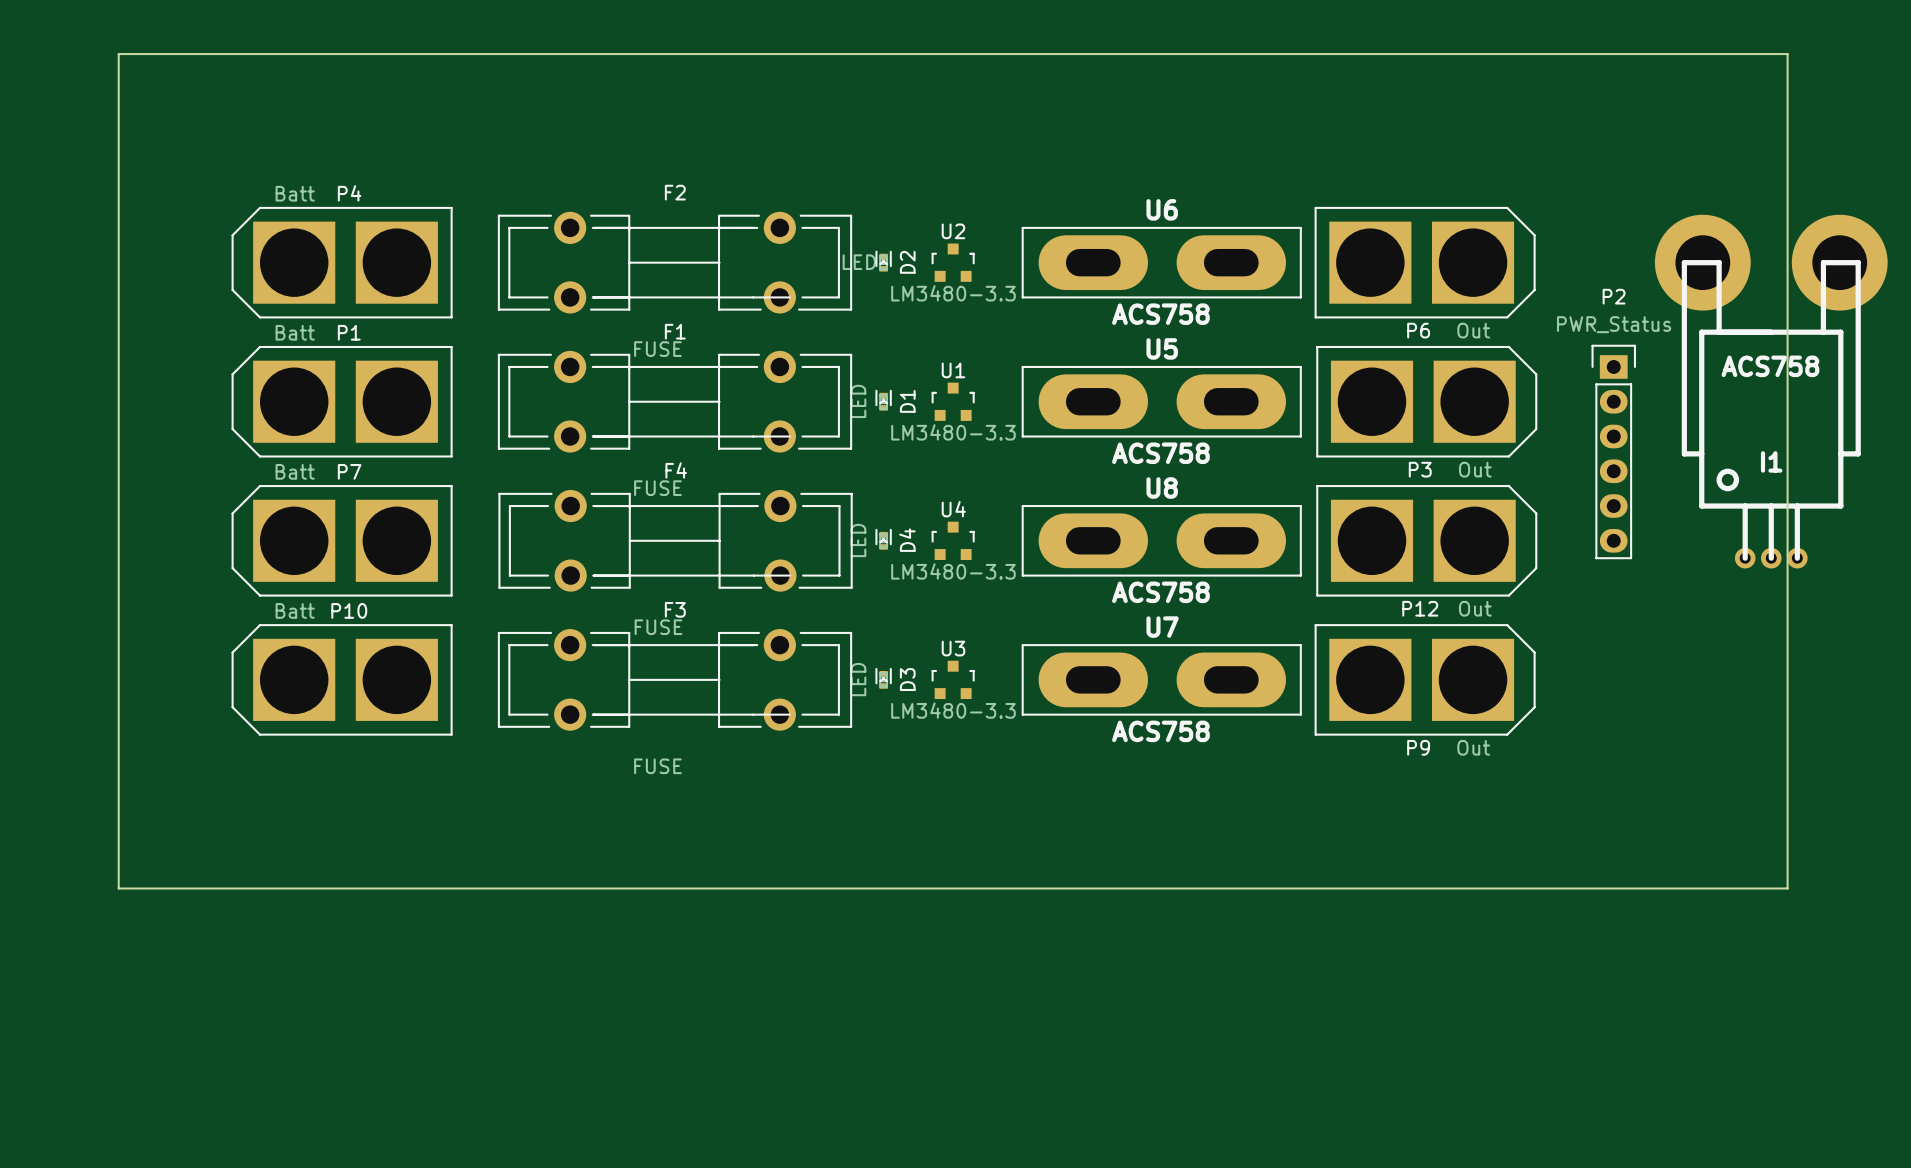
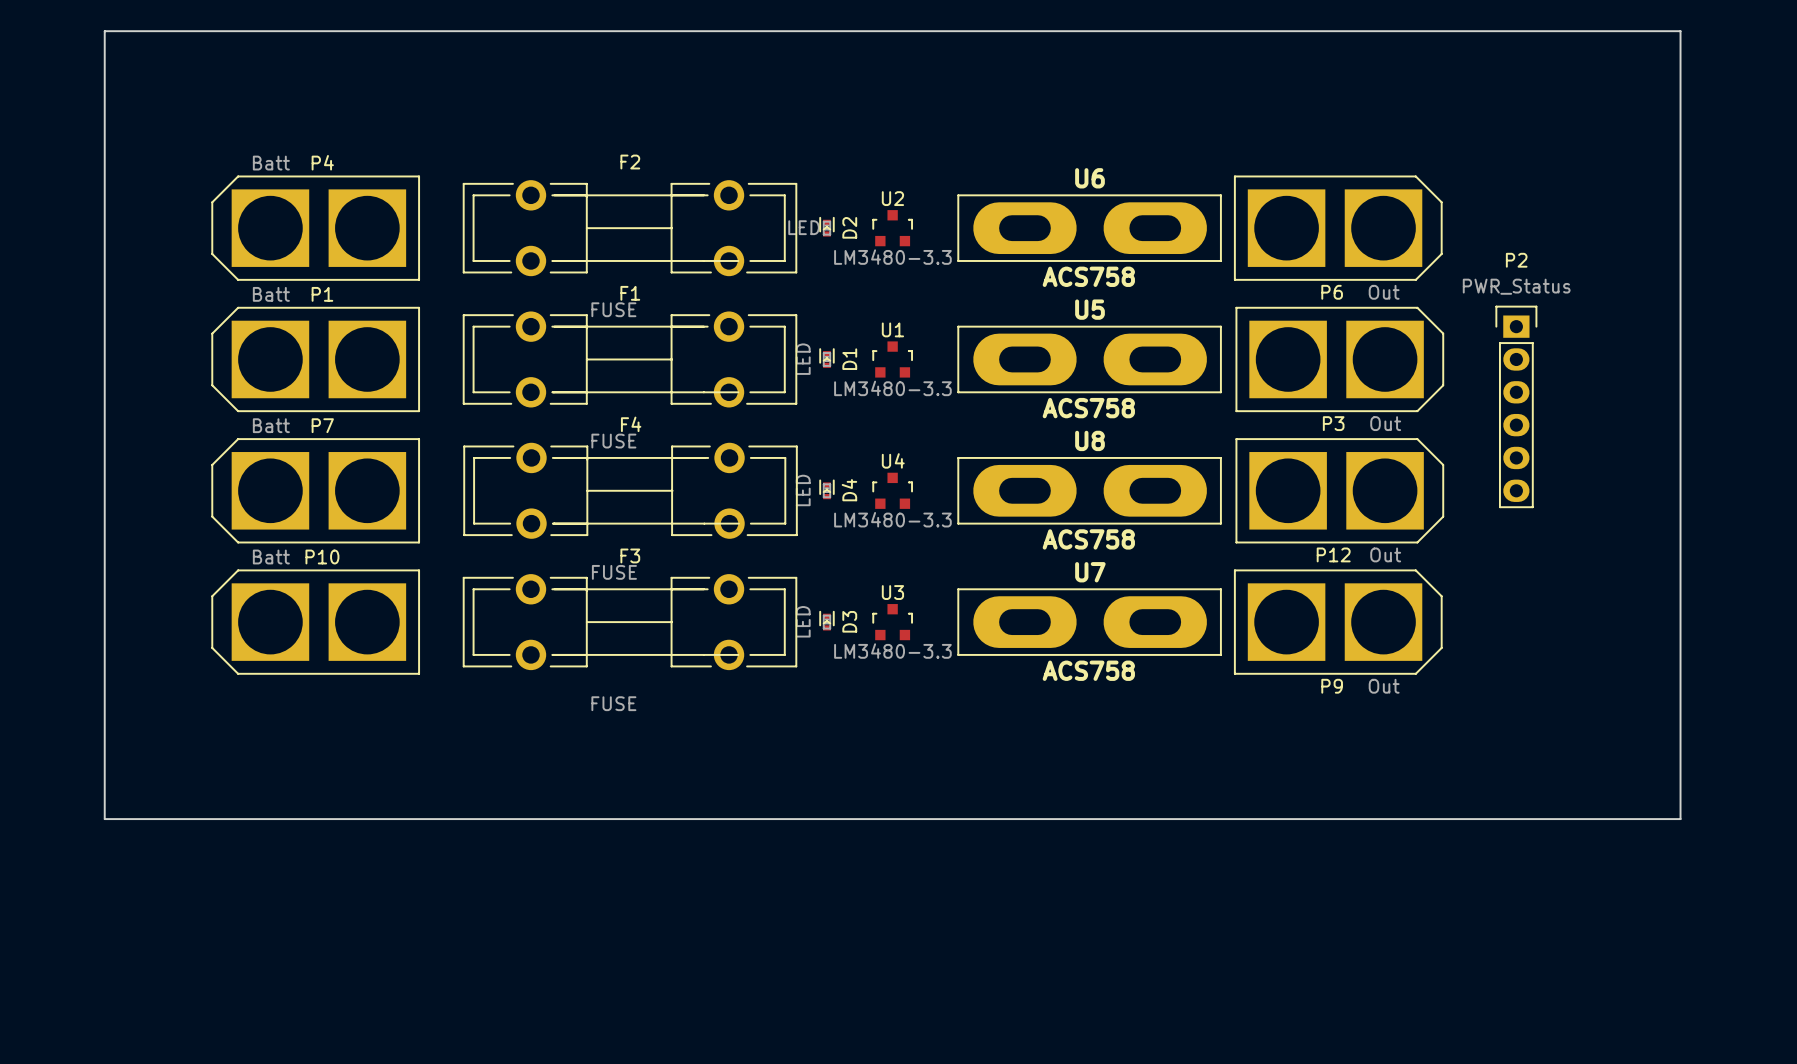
I1: ACS758 (1771, 391) -> none

